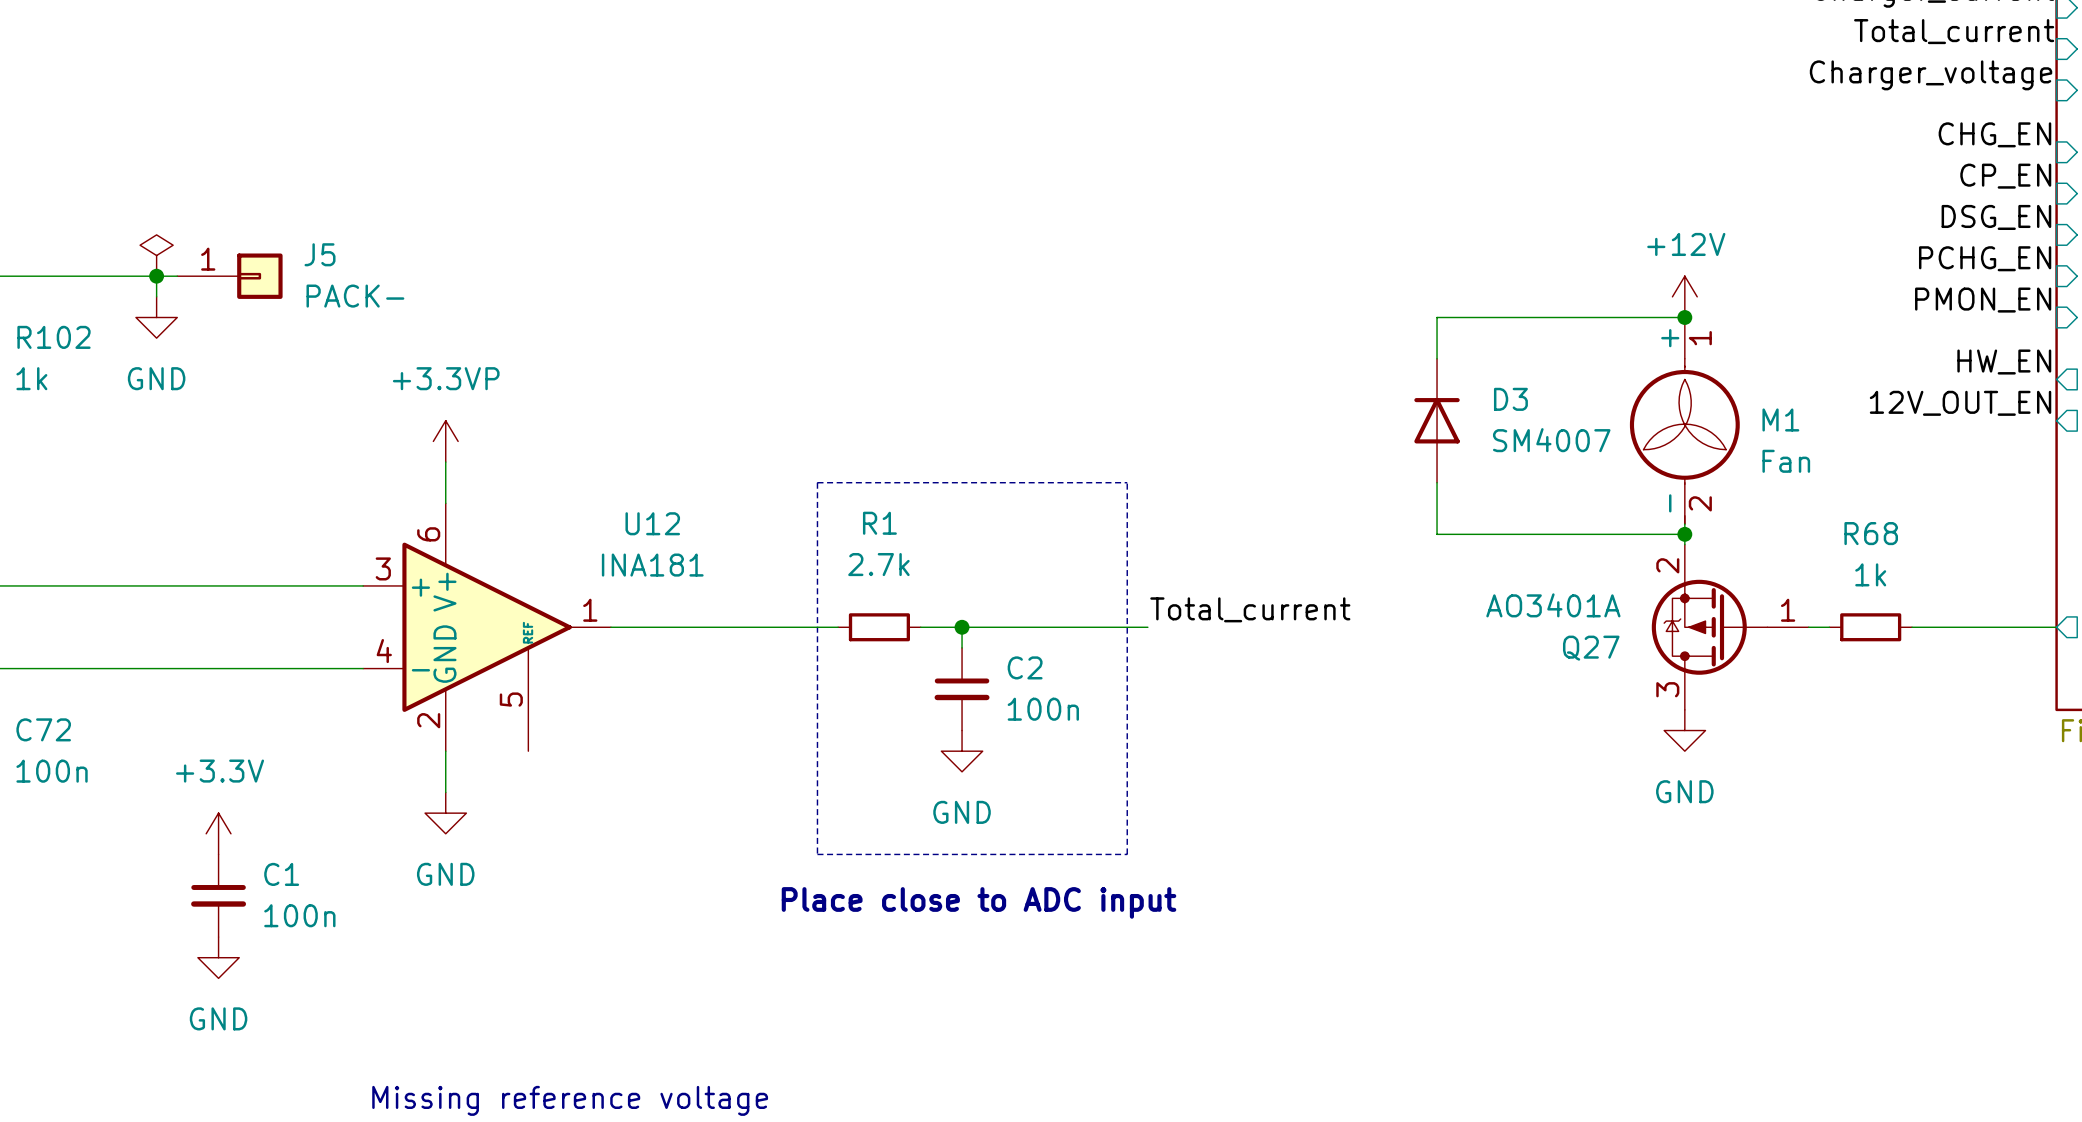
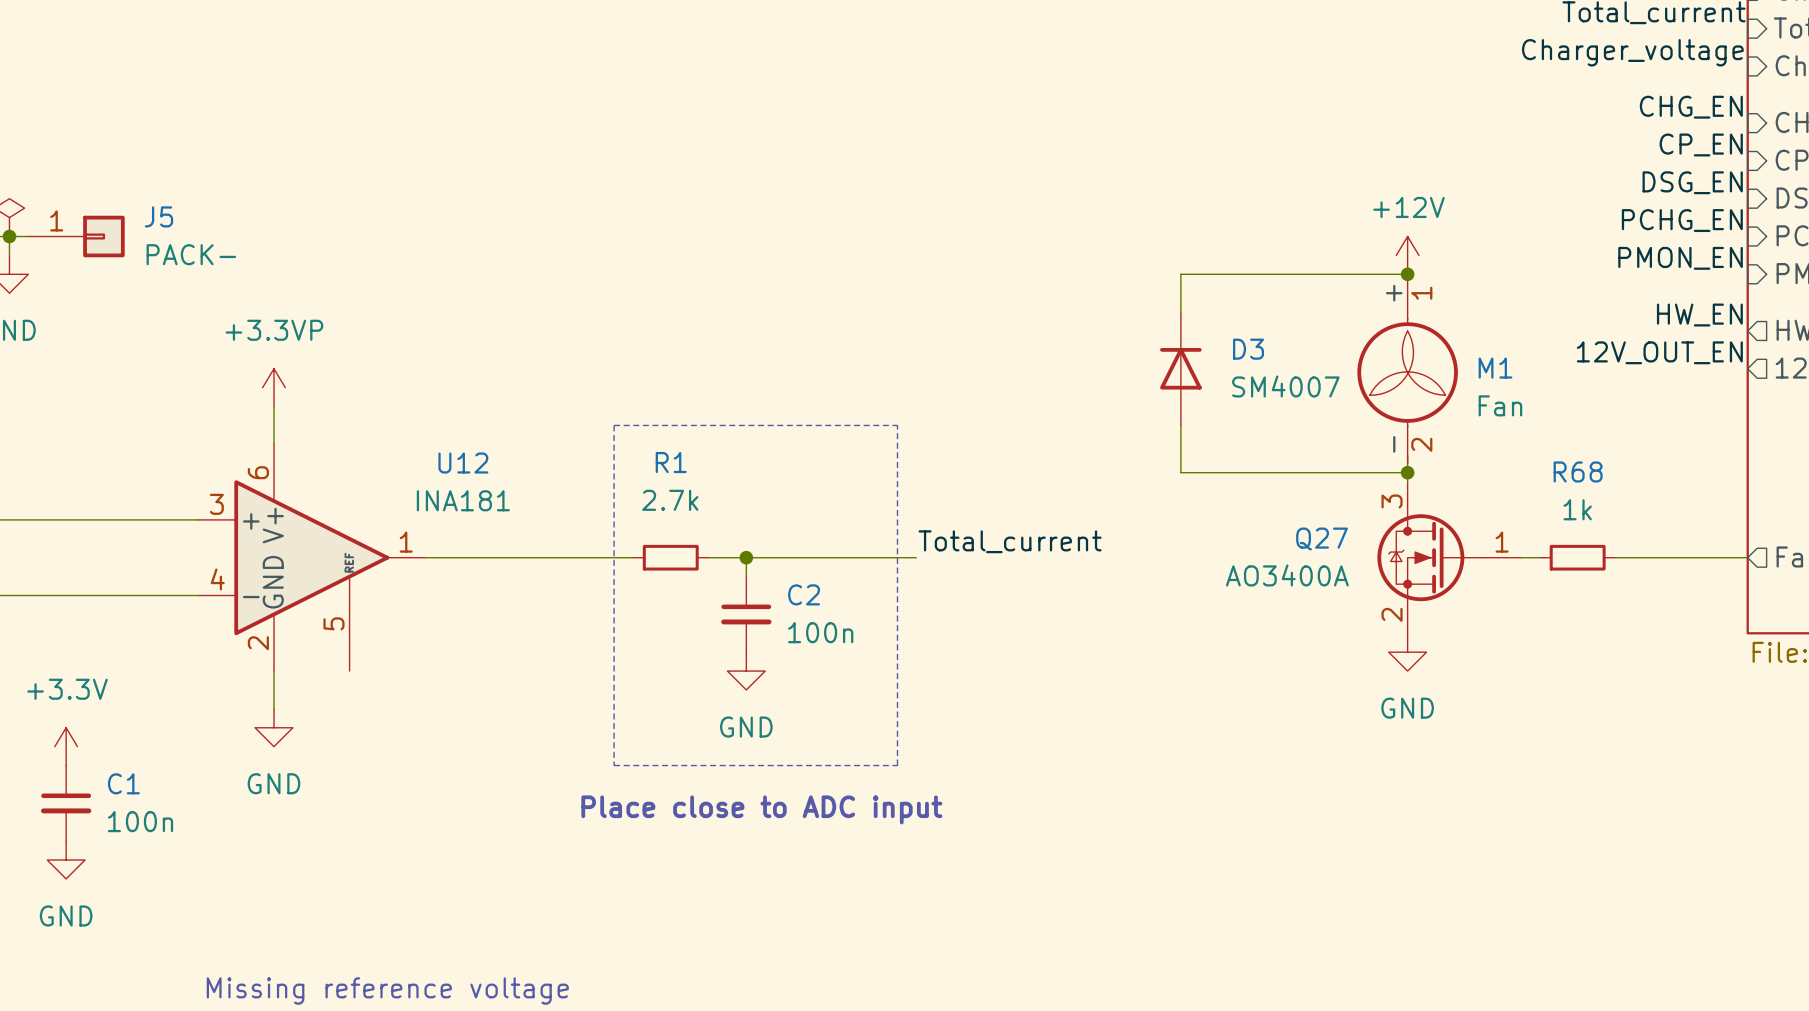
Q27 symbol: [1651, 544, 1809, 710] -> [1377, 482, 1521, 634]
Q27 value: AO3401A (1553, 605) -> AO3400A (1287, 575)
Q27 name position: Q27 (1591, 648) -> Q27 (1322, 539)

